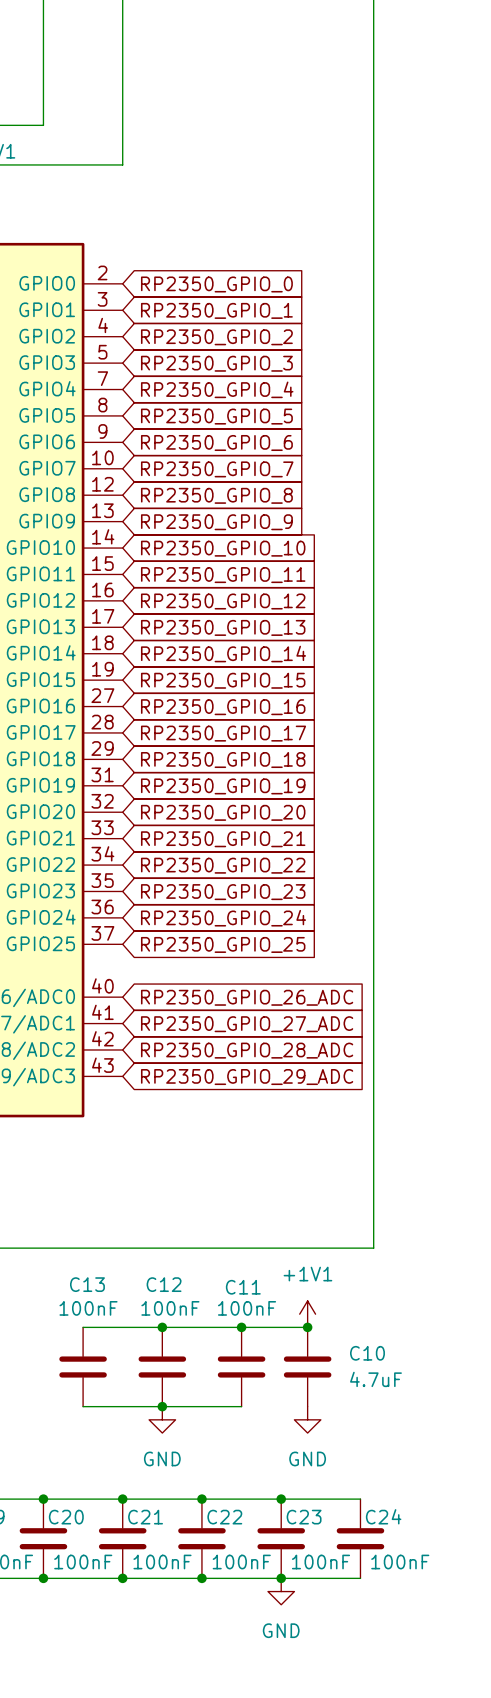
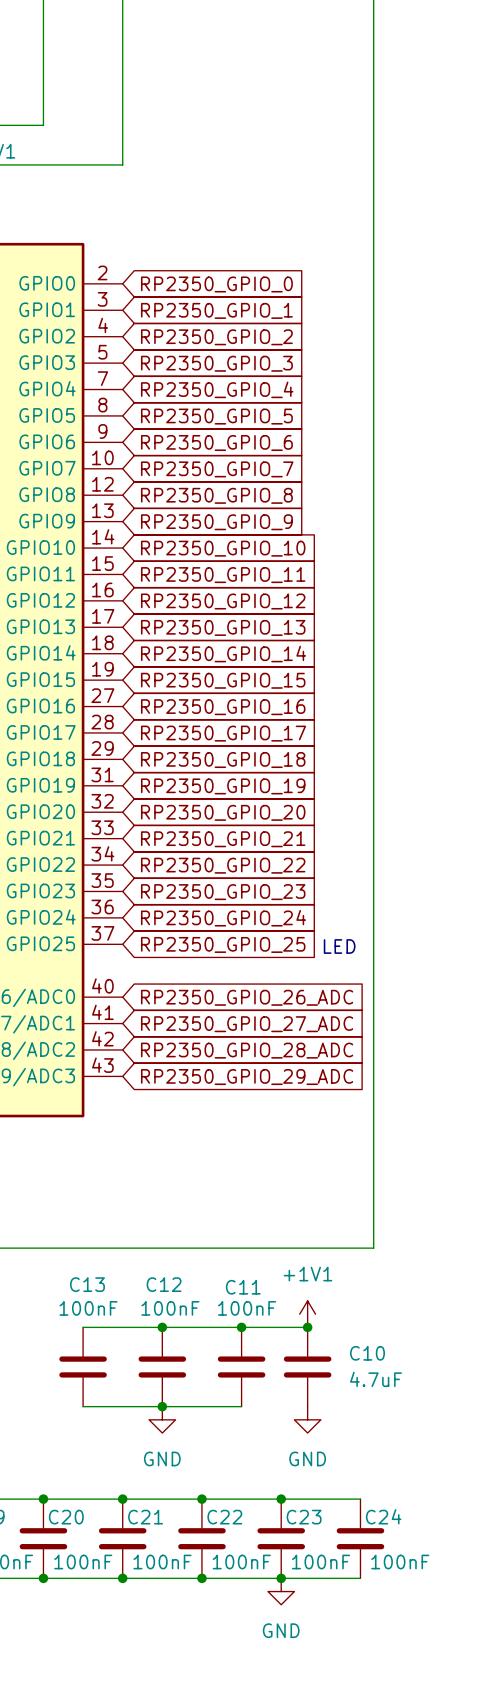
text: none -> LED (339, 946)

